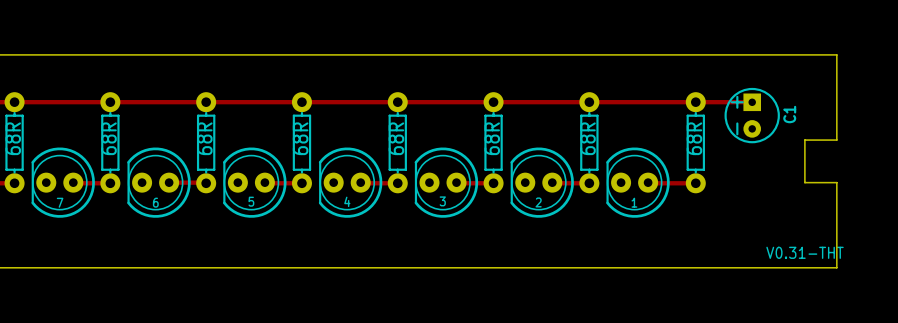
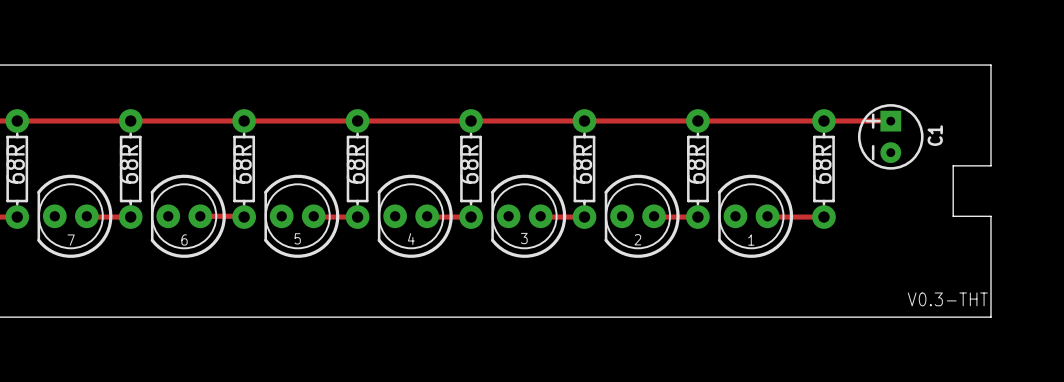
text: V0.31-THT (805, 252) -> V0.3-THT (947, 299)

